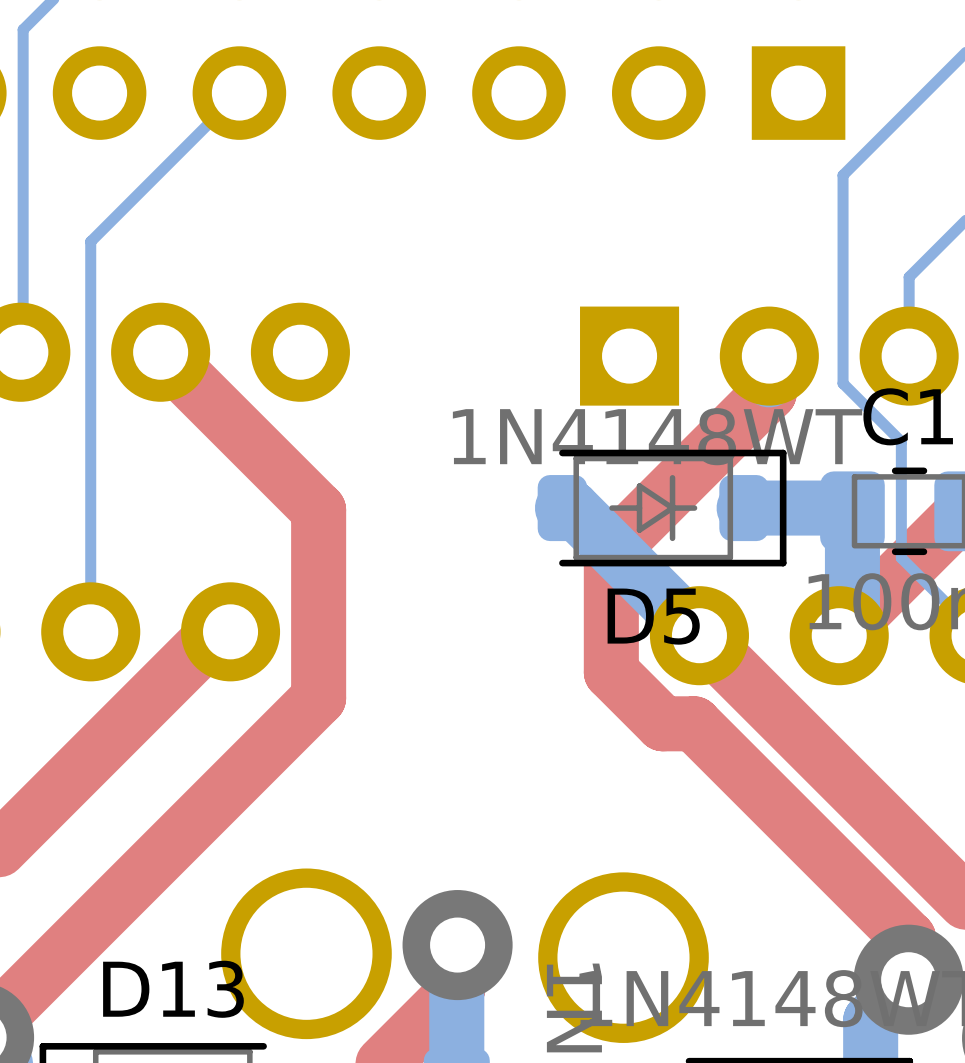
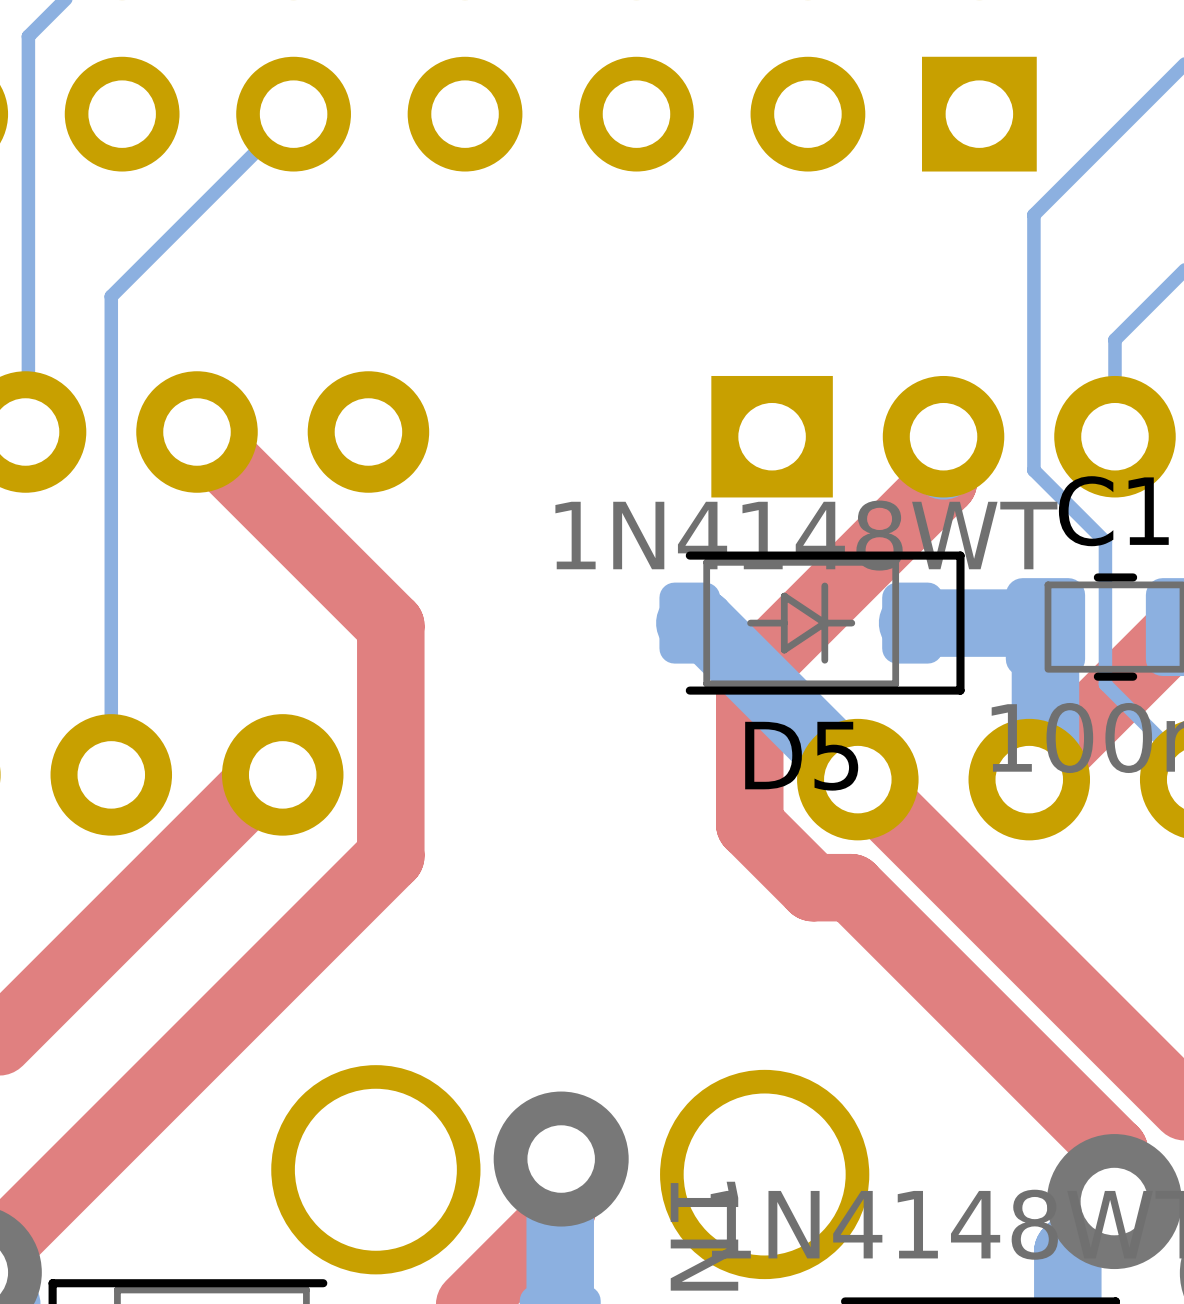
D13 name: D13 (173, 989) -> none

